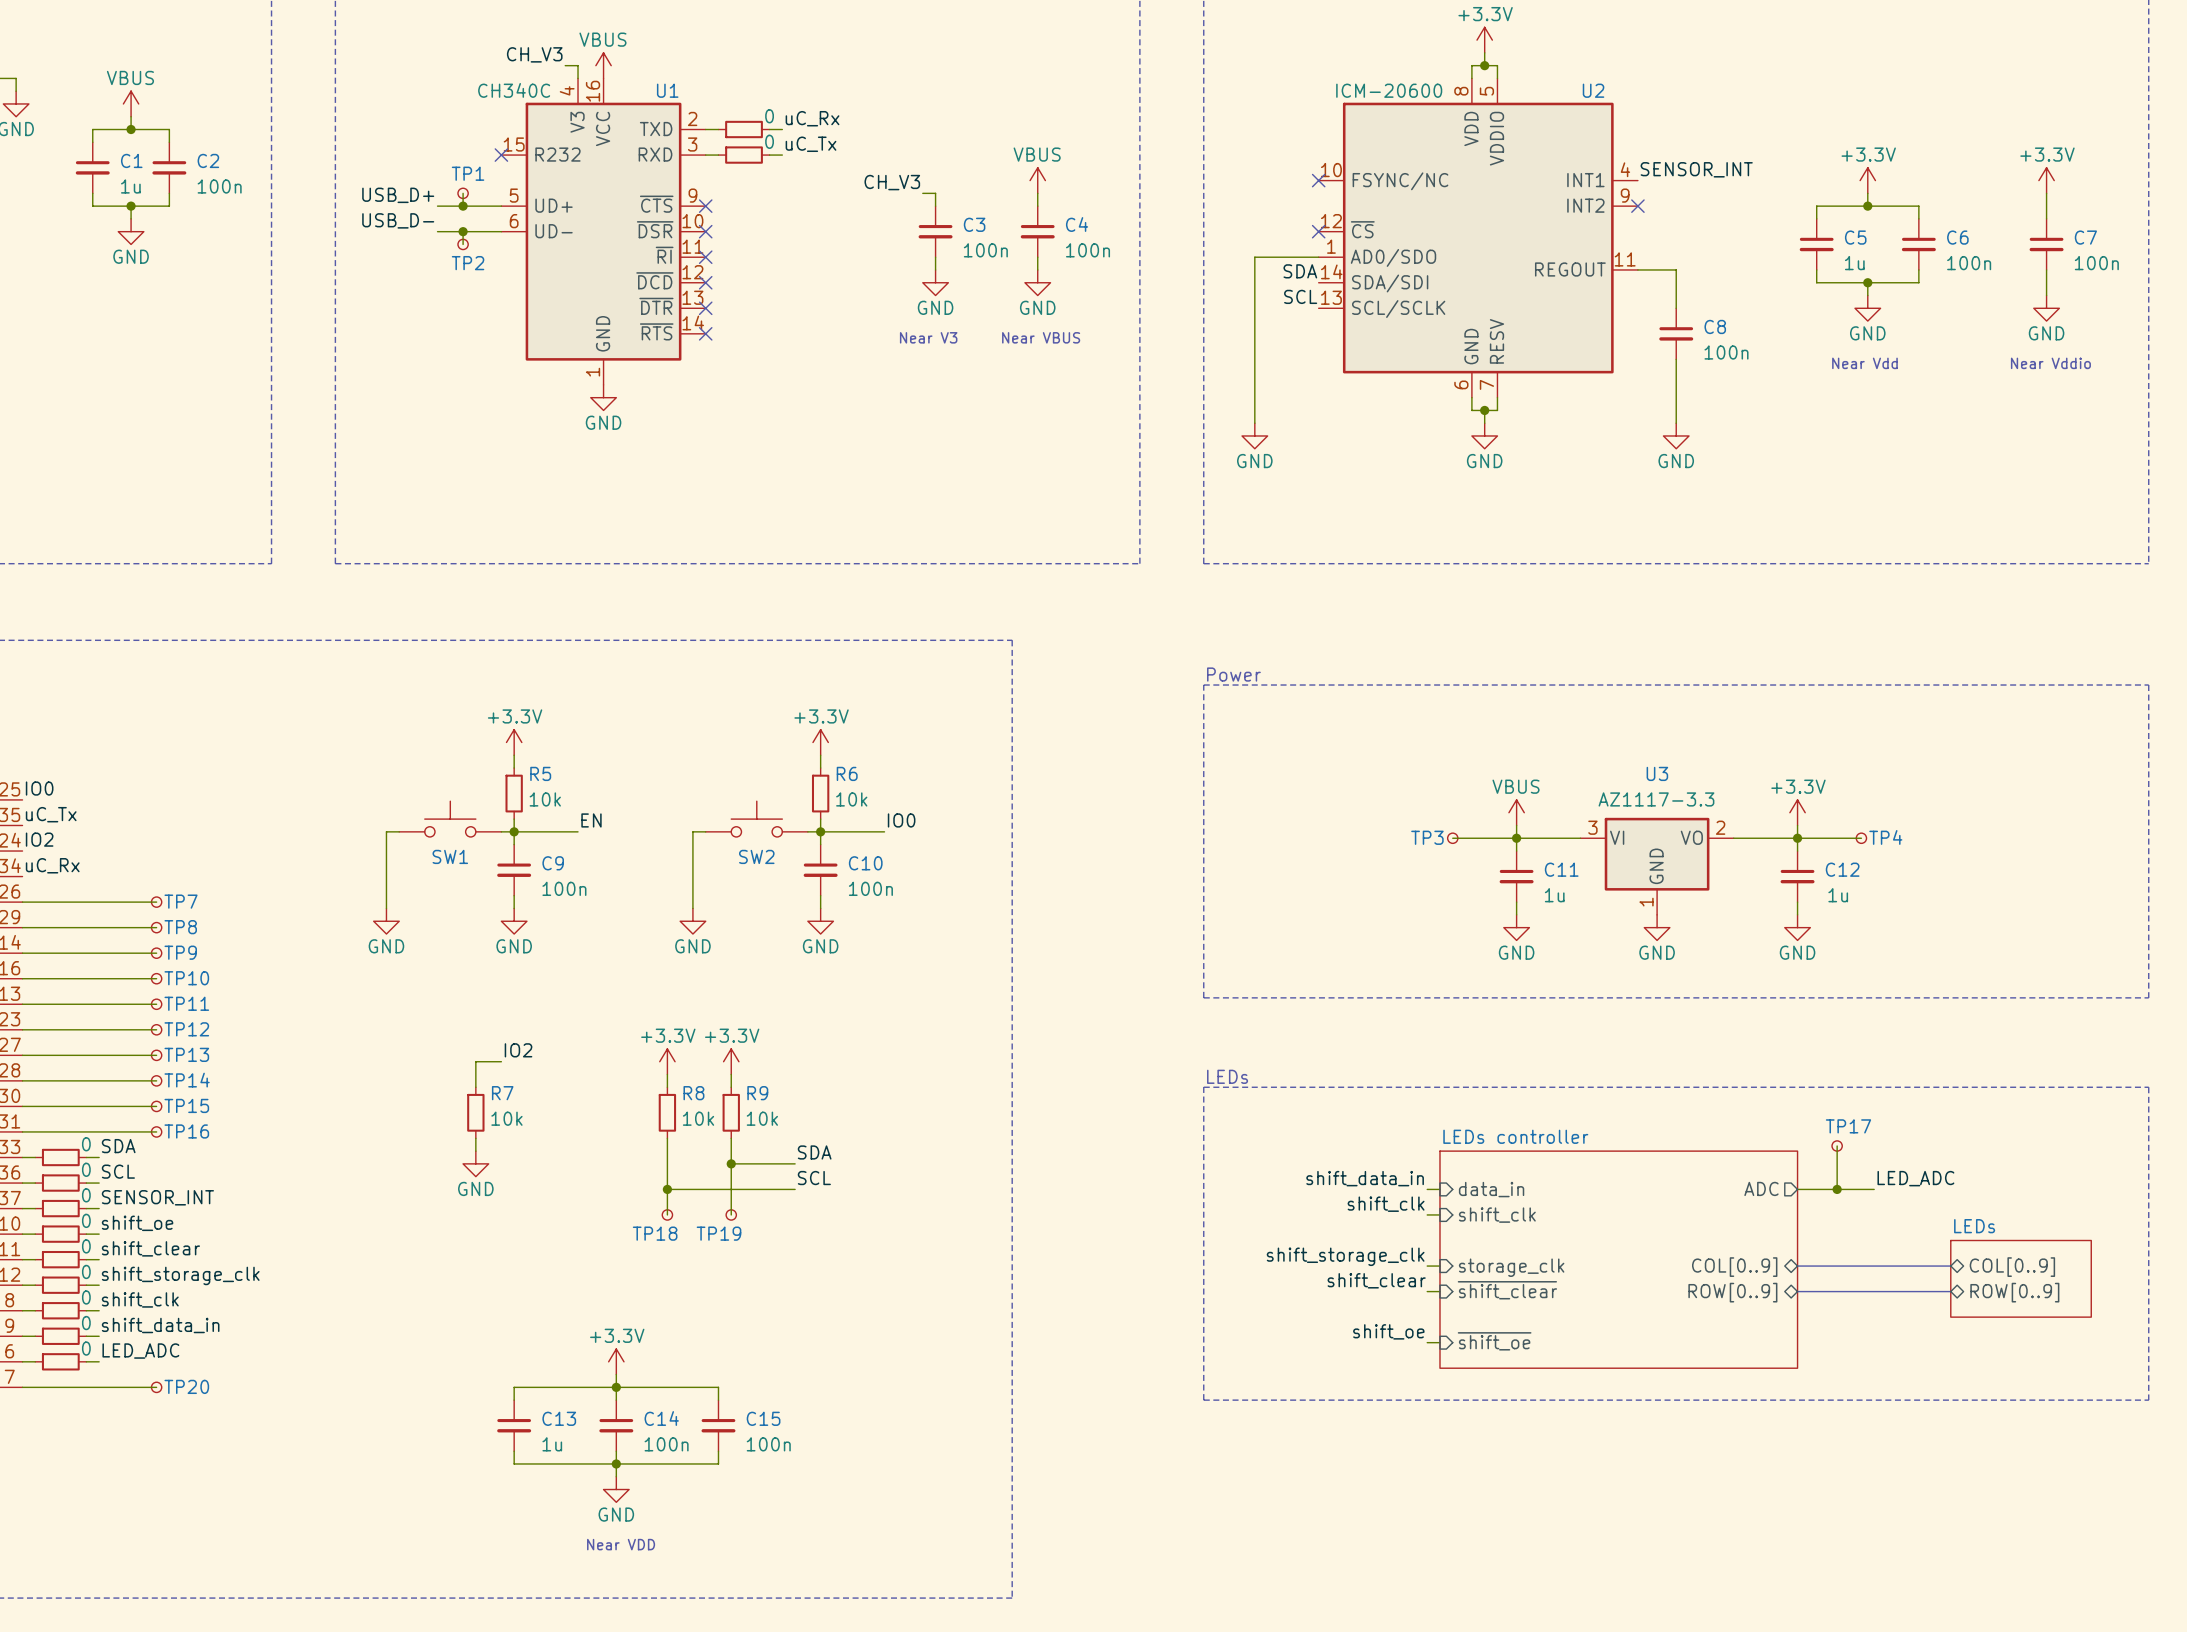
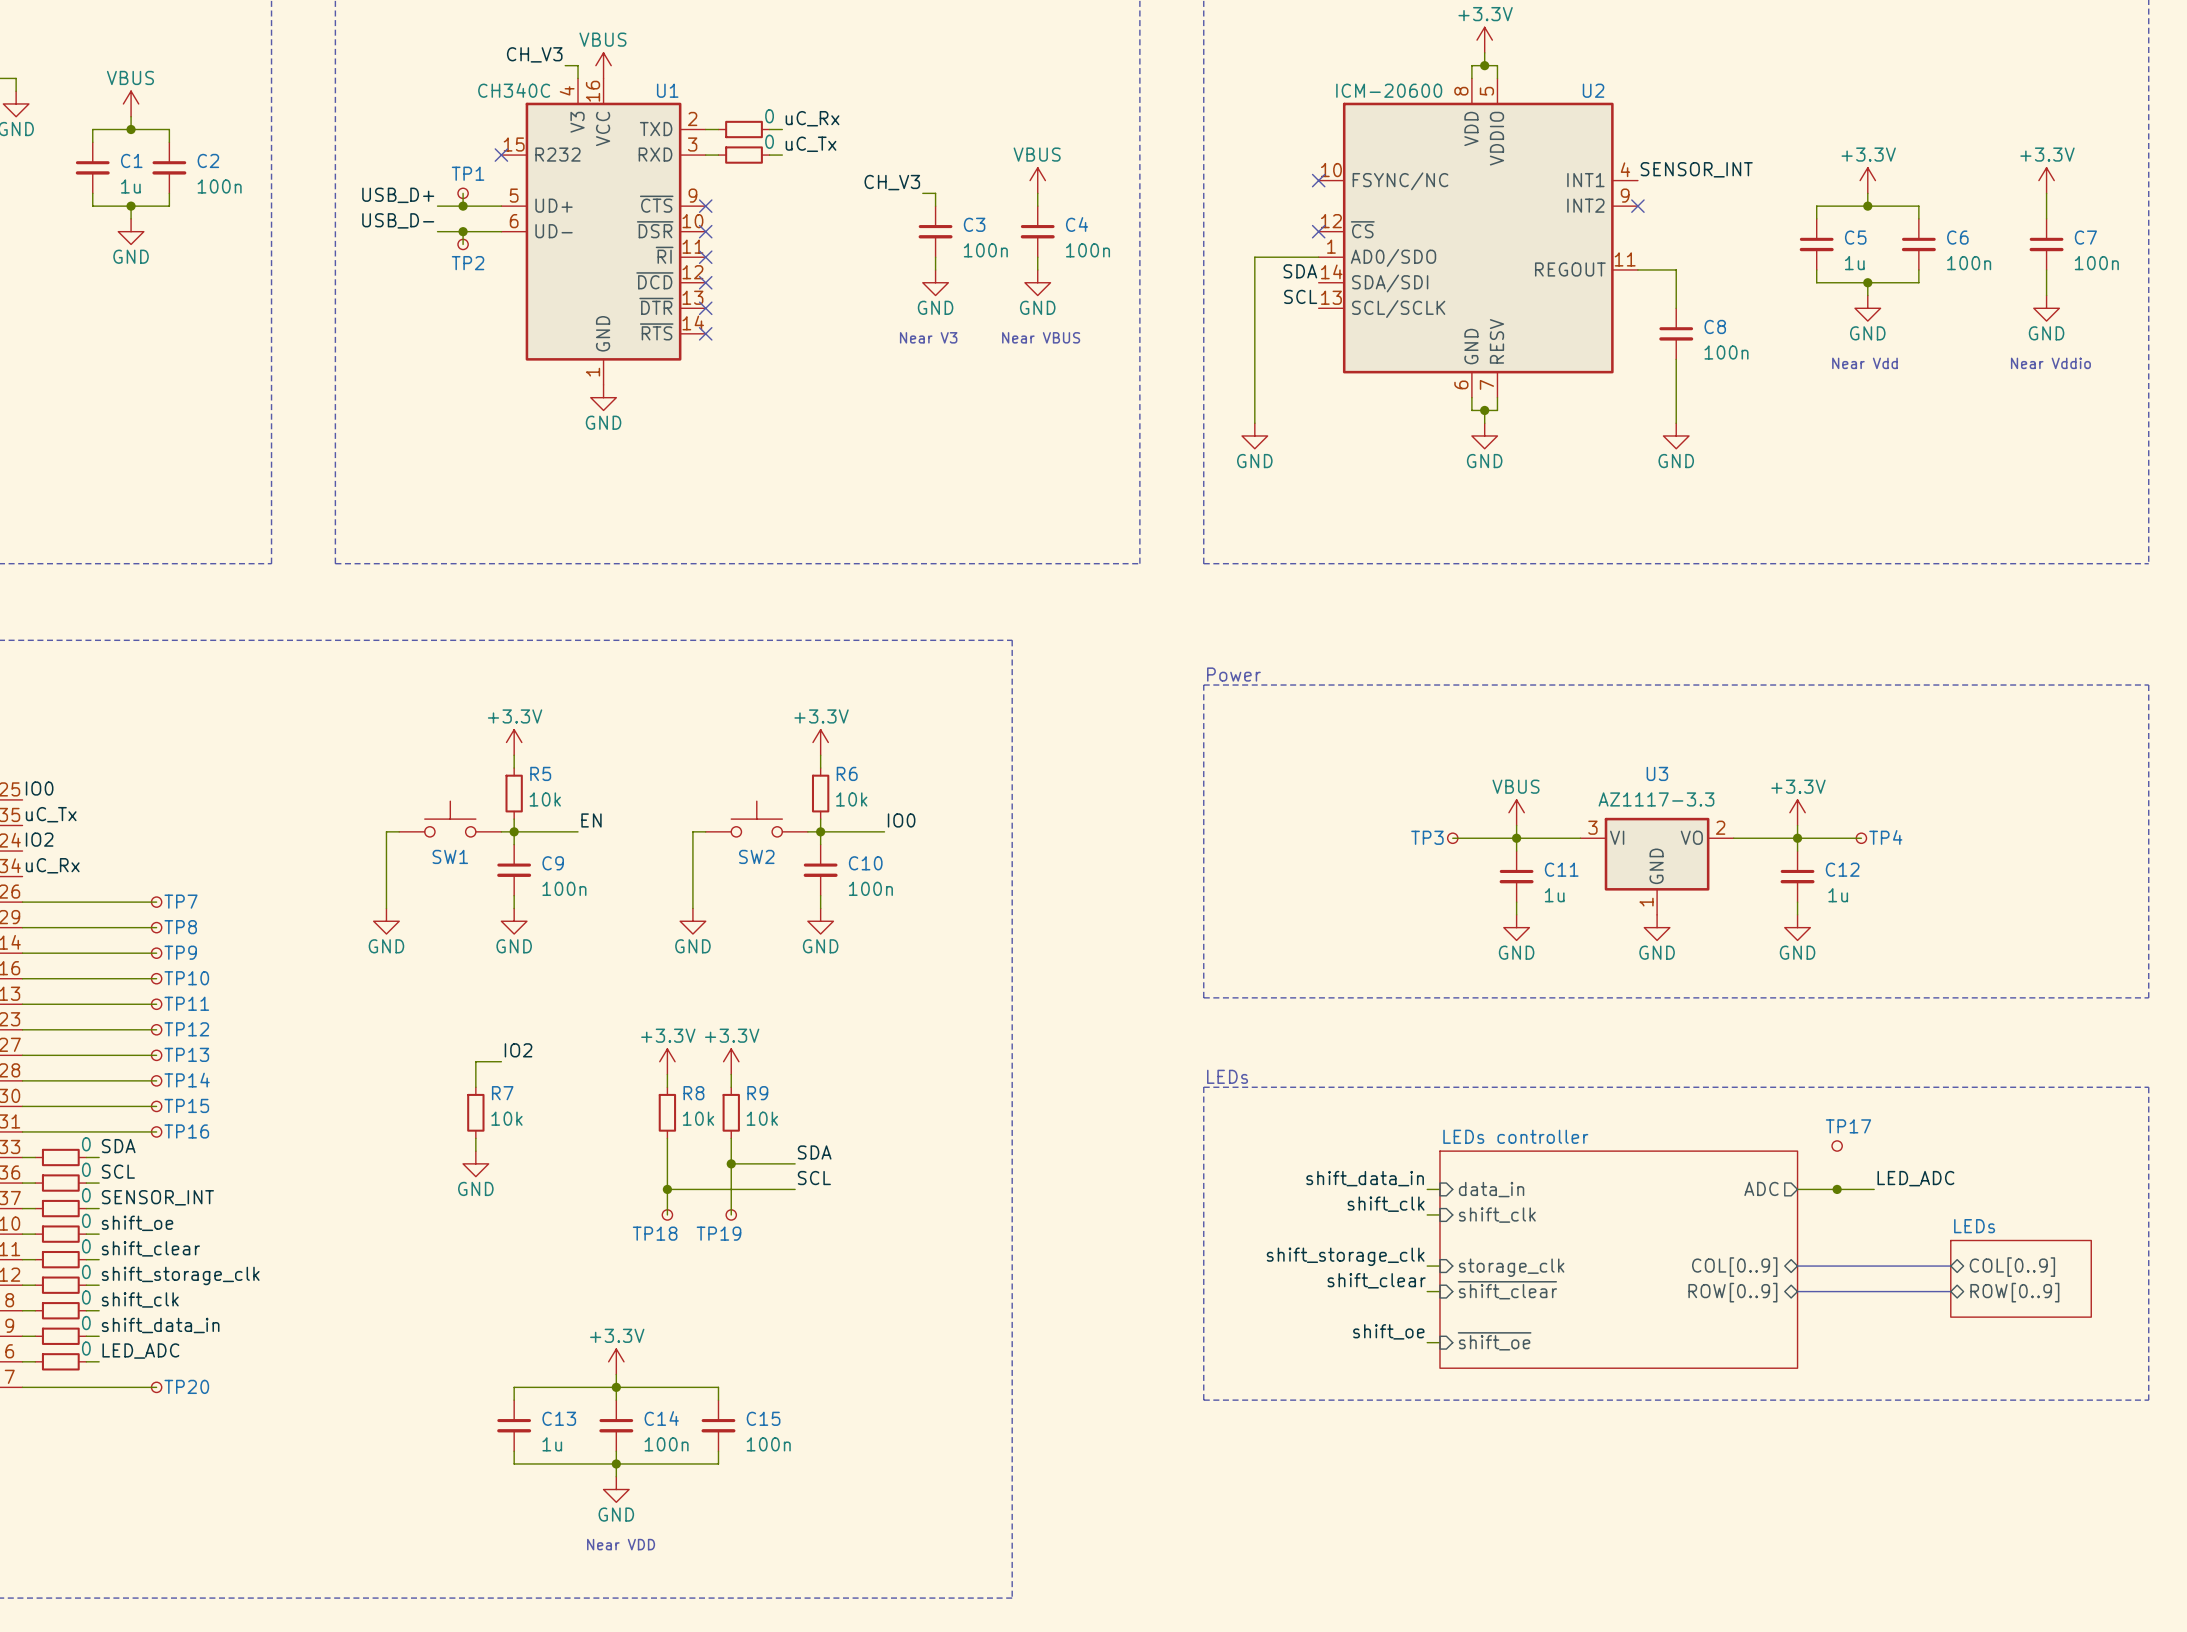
wire: (1837, 1146) (1837, 1189) -> none

